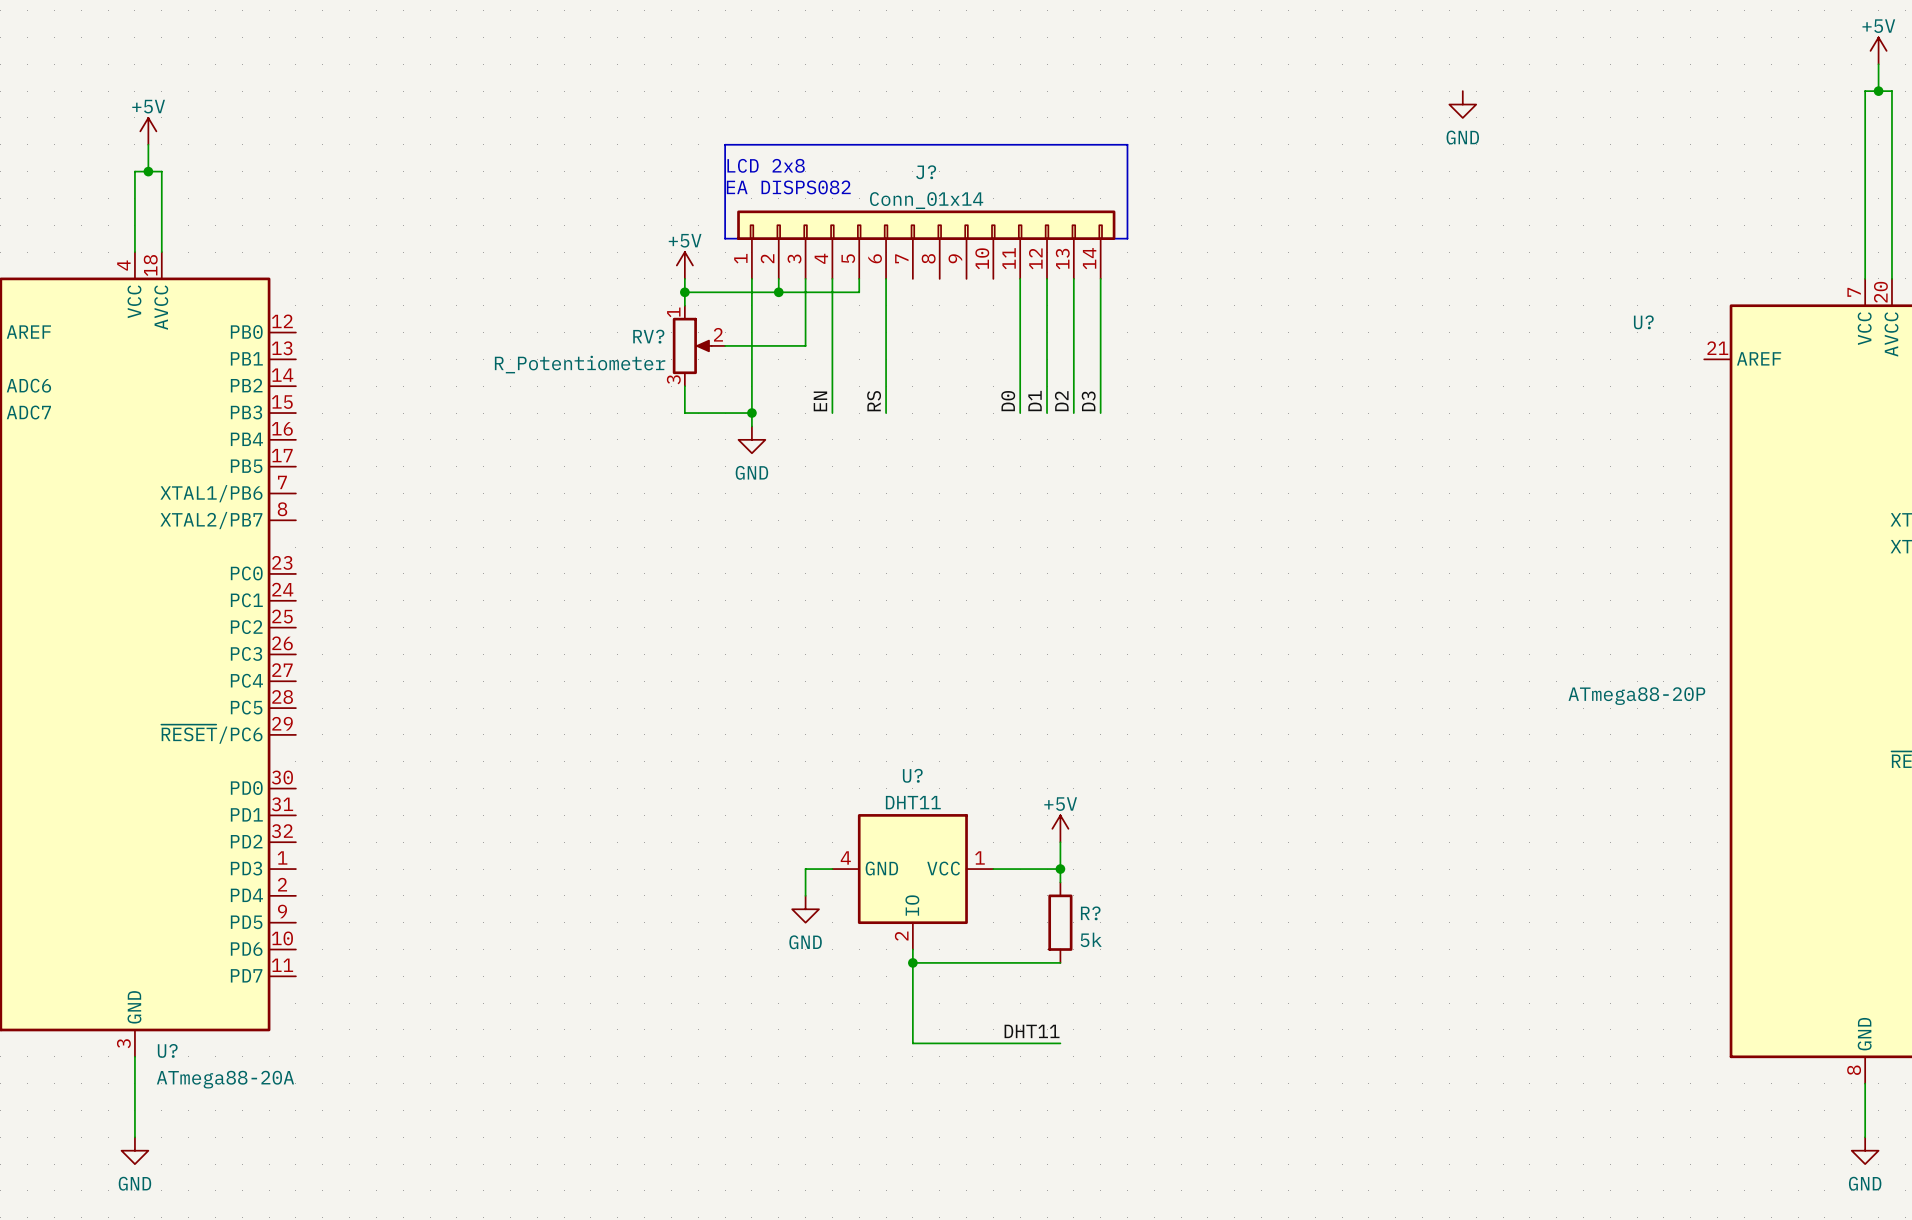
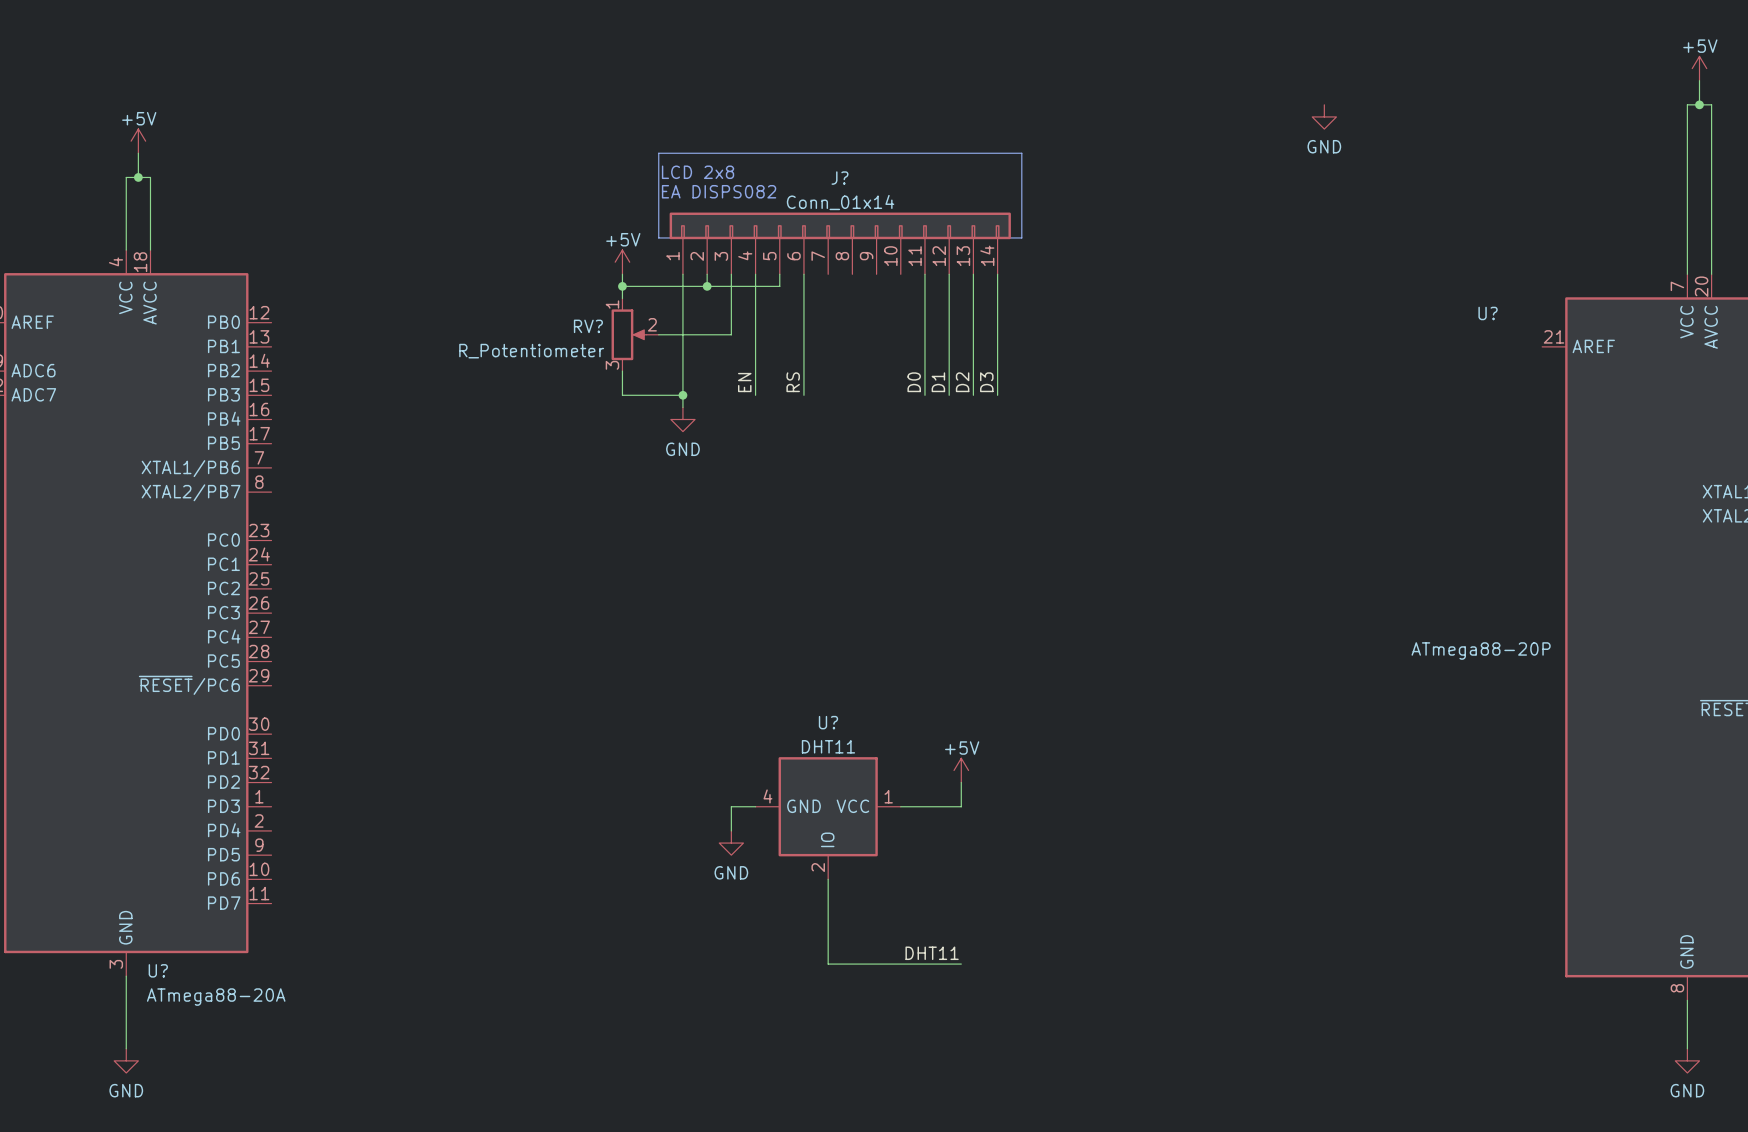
wire: (1060, 869) (1060, 882) -> none
junction: (1060, 869) -> none
R?: 5k (1060, 922) -> none
wire: (912, 962) (1060, 962) -> none
junction: (912, 962) -> none

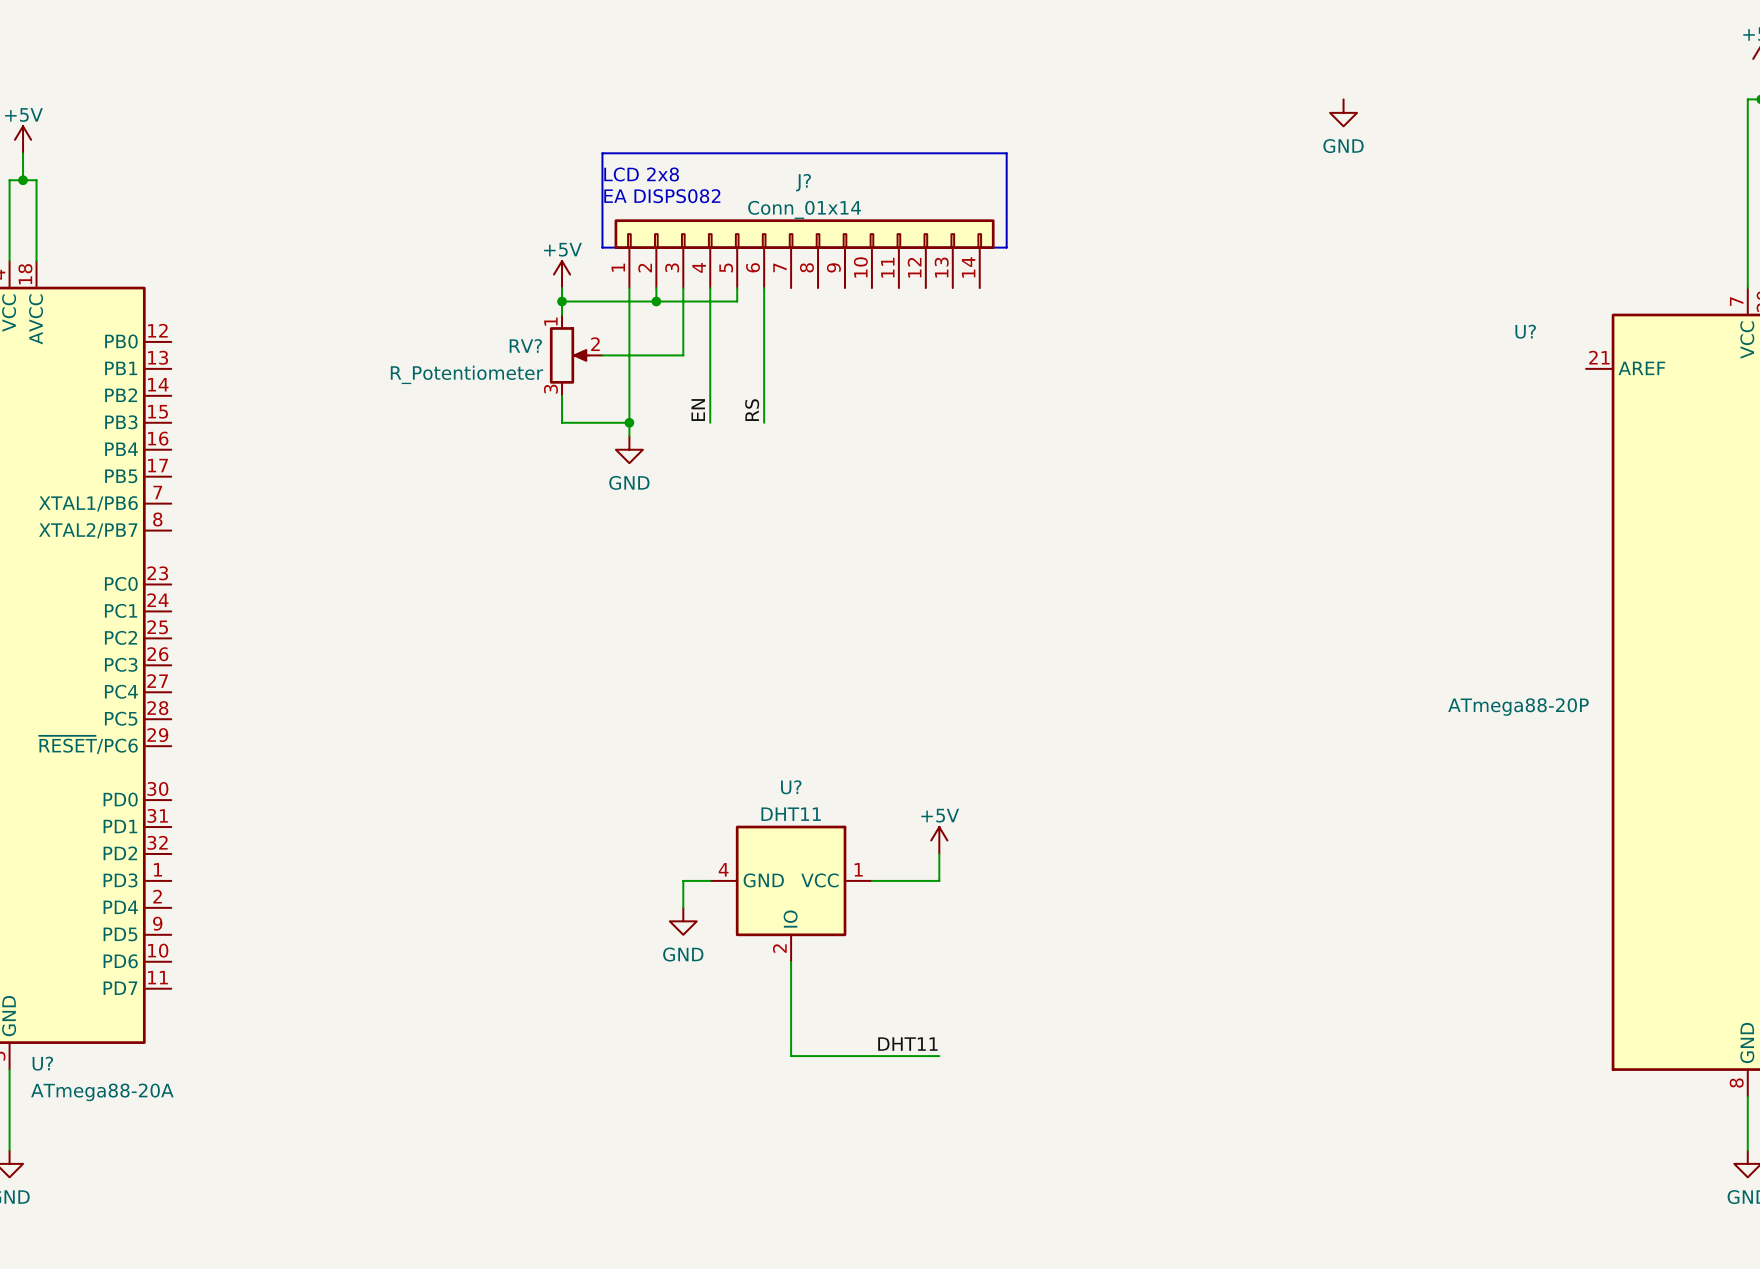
wire: (924, 274) (924, 395) -> none
wire: (949, 274) (949, 395) -> none
wire: (973, 274) (973, 395) -> none
wire: (997, 274) (997, 395) -> none
label: D0 (914, 382) -> none
label: D1 (938, 382) -> none
label: D2 (962, 382) -> none
label: D3 (986, 382) -> none

